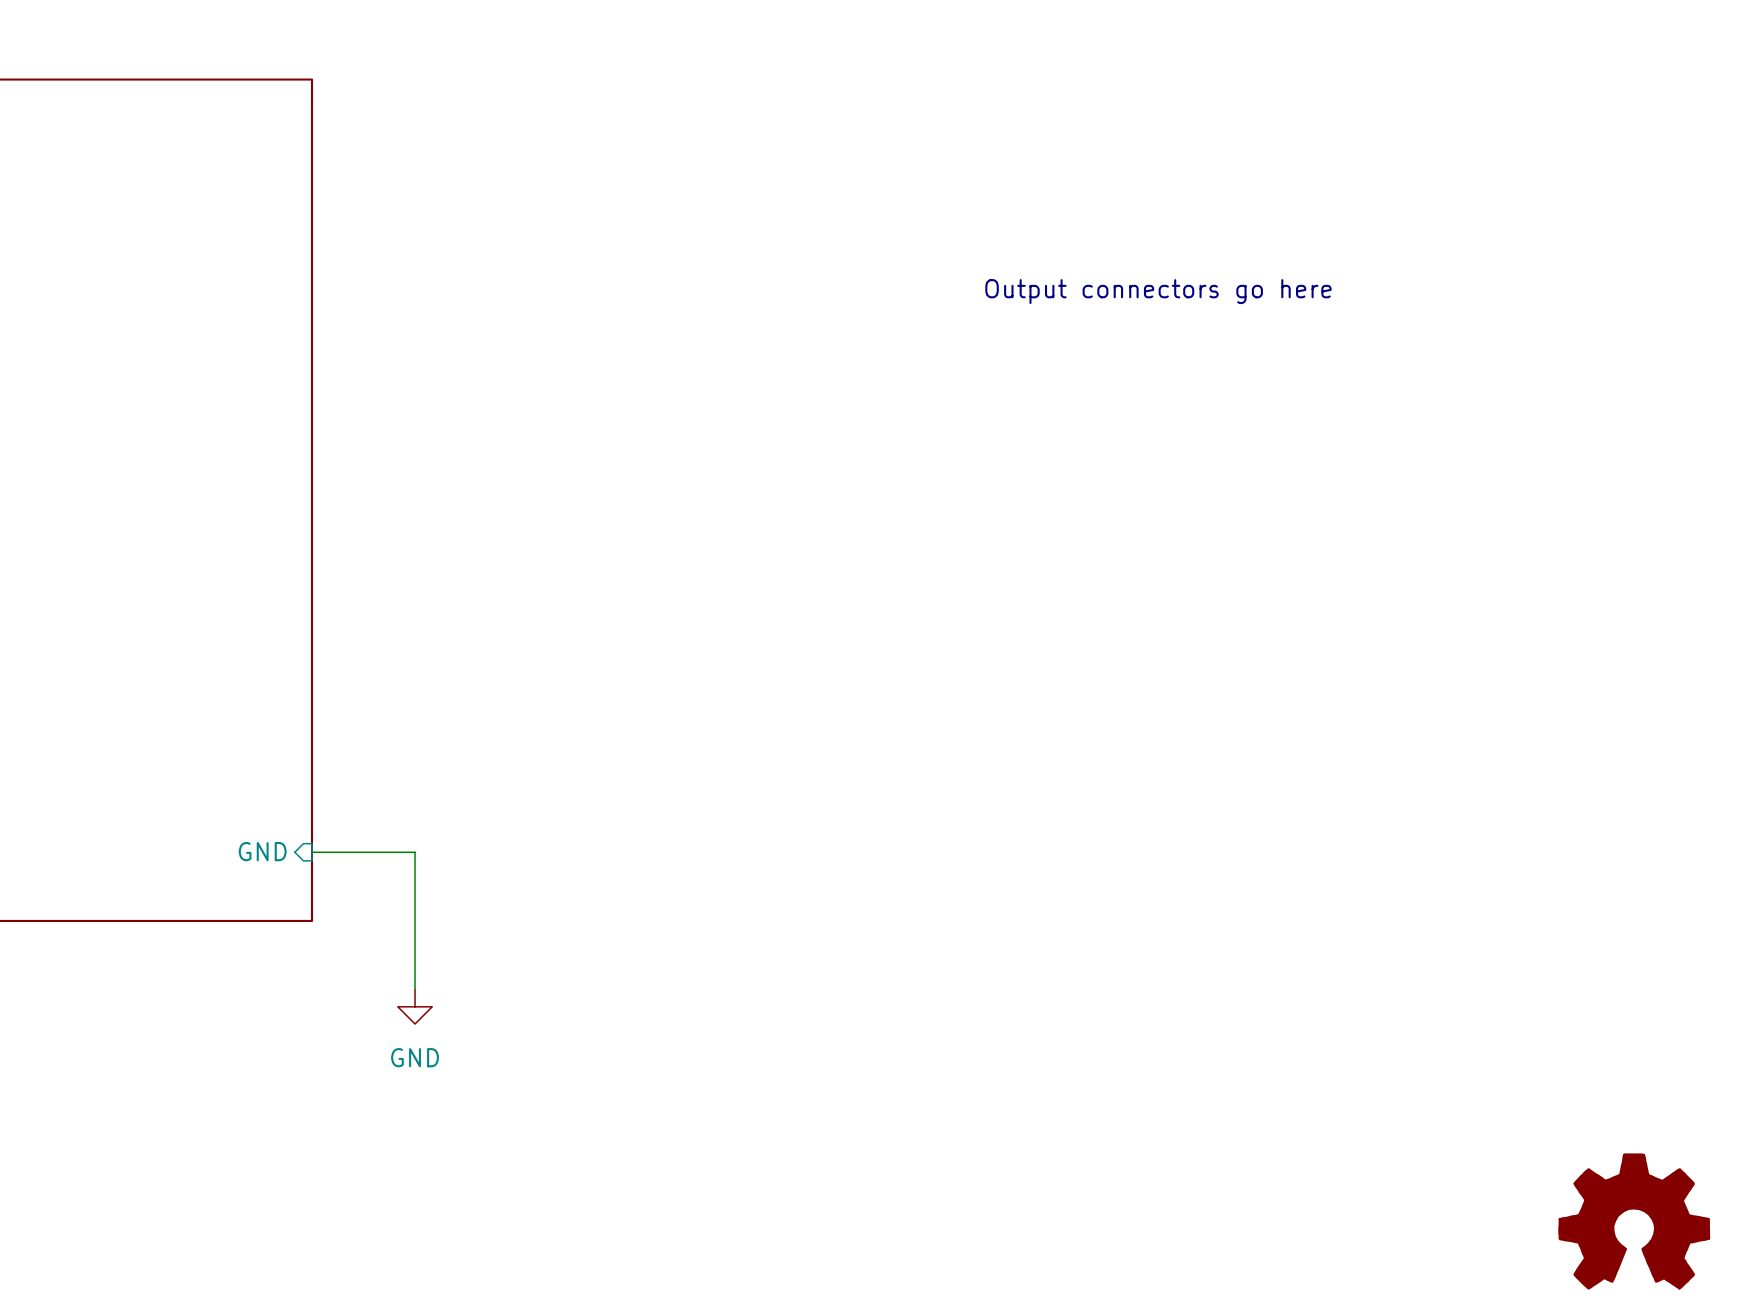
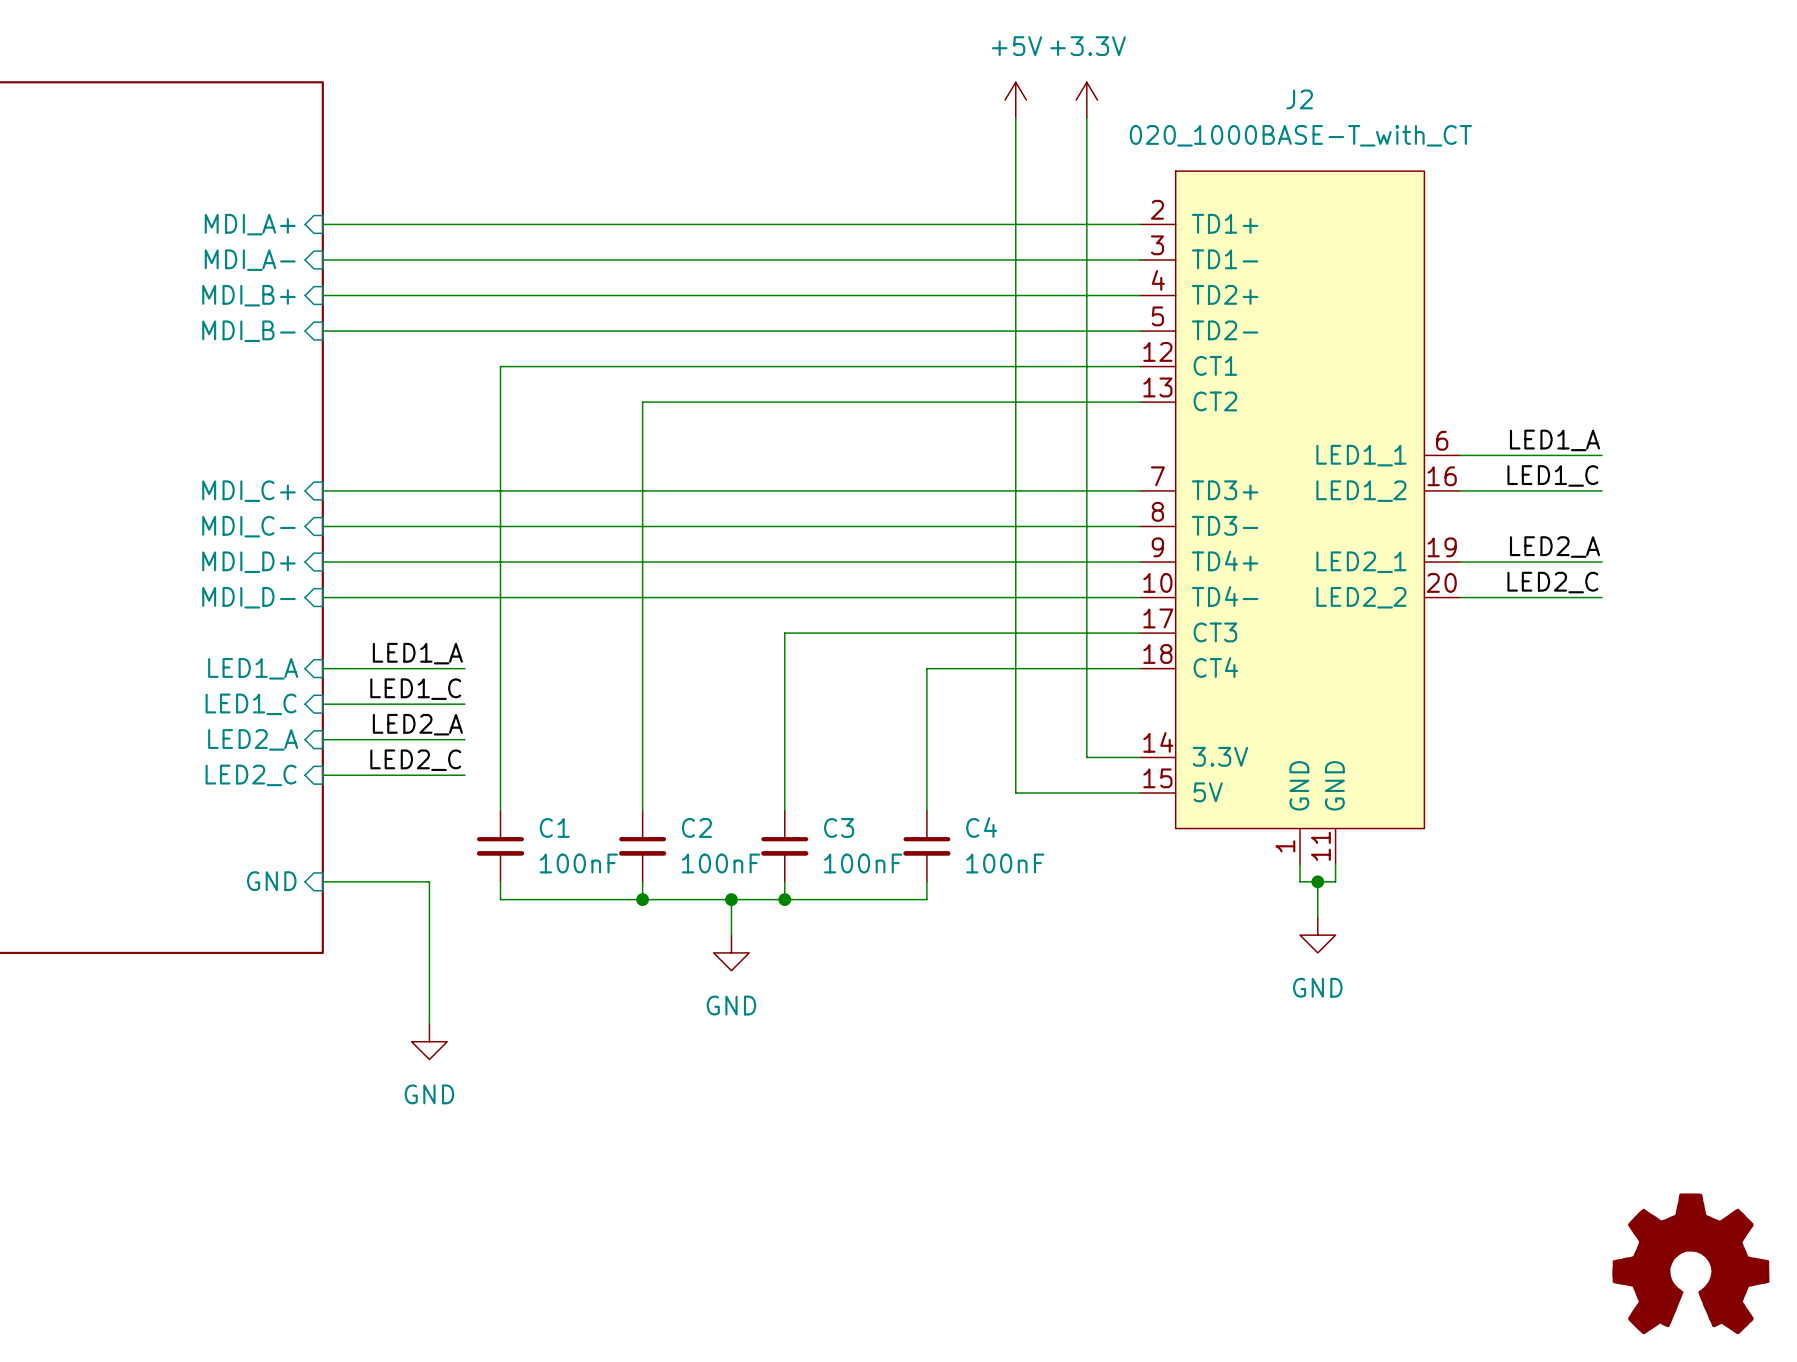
power symbol: none -> +5V (1015, 100)
power symbol: none -> +3.3V (1086, 100)
wire: none -> (1015, 117) (1015, 793) (1140, 793)
wire: none -> (1086, 117) (1086, 757) (1140, 757)
wire: none -> (322, 224) (1140, 224)
sheet pin: none -> MDI_A+ (250, 224)
sheet pin: none -> MDI_A- (250, 260)
wire: none -> (322, 259) (1140, 259)
sheet pin: none -> MDI_B+ (248, 295)
wire: none -> (322, 295) (1140, 295)
text: Output connectors go here (1158, 291) -> none
wire: none -> (322, 331) (1140, 331)
sheet pin: none -> MDI_B- (248, 331)
wire: none -> (1140, 366) (500, 366) (500, 810)
wire: none -> (1140, 402) (642, 402) (642, 810)
label: none -> LED1_A (1554, 440)
wire: none -> (1459, 455) (1602, 455)
label: none -> LED1_C (1552, 475)
sheet pin: none -> MDI_C+ (248, 491)
wire: none -> (322, 490) (1140, 490)
wire: none -> (1459, 490) (1602, 490)
J2: none -> 020_1000BASE-T_with_CT (1300, 517)
wire: none -> (322, 526) (1140, 526)
sheet pin: none -> MDI_C- (248, 526)
label: none -> LED2_A (1554, 547)
sheet pin: none -> MDI_D+ (248, 562)
wire: none -> (322, 562) (1140, 562)
wire: none -> (1459, 562) (1602, 562)
label: none -> LED2_C (1552, 582)
sheet pin: none -> MDI_D- (248, 597)
wire: none -> (322, 597) (1140, 597)
wire: none -> (1459, 597) (1602, 597)
wire: none -> (1140, 633) (784, 633) (784, 810)
label: none -> LED1_A (417, 653)
sheet pin: none -> LED1_A (253, 668)
wire: none -> (322, 668) (464, 668)
wire: none -> (1140, 668) (926, 668) (926, 810)
label: none -> LED1_C (415, 689)
sheet pin: none -> LED1_C (251, 704)
wire: none -> (322, 704) (464, 704)
label: none -> LED2_A (417, 724)
wire: none -> (322, 739) (464, 739)
sheet pin: none -> LED2_A (253, 739)
label: none -> LED2_C (415, 760)
sheet pin: none -> LED2_C (251, 775)
wire: none -> (322, 775) (464, 775)
C1: none -> 100nF (500, 846)
C2: none -> 100nF (642, 846)
C3: none -> 100nF (784, 846)
C4: none -> 100nF (926, 846)
wire: none -> (1300, 864) (1300, 881) (1335, 881) (1335, 864)
wire: none -> (500, 881) (500, 899) (926, 899) (926, 881)
wire: none -> (642, 881) (642, 899)
wire: none -> (784, 881) (784, 899)
wire: none -> (1317, 881) (1317, 917)
junction: none -> (1317, 881)
junction: none -> (642, 899)
wire: none -> (731, 899) (731, 935)
junction: none -> (731, 899)
junction: none -> (784, 899)
power symbol: none -> GND (1317, 935)
power symbol: none -> GND (731, 952)

